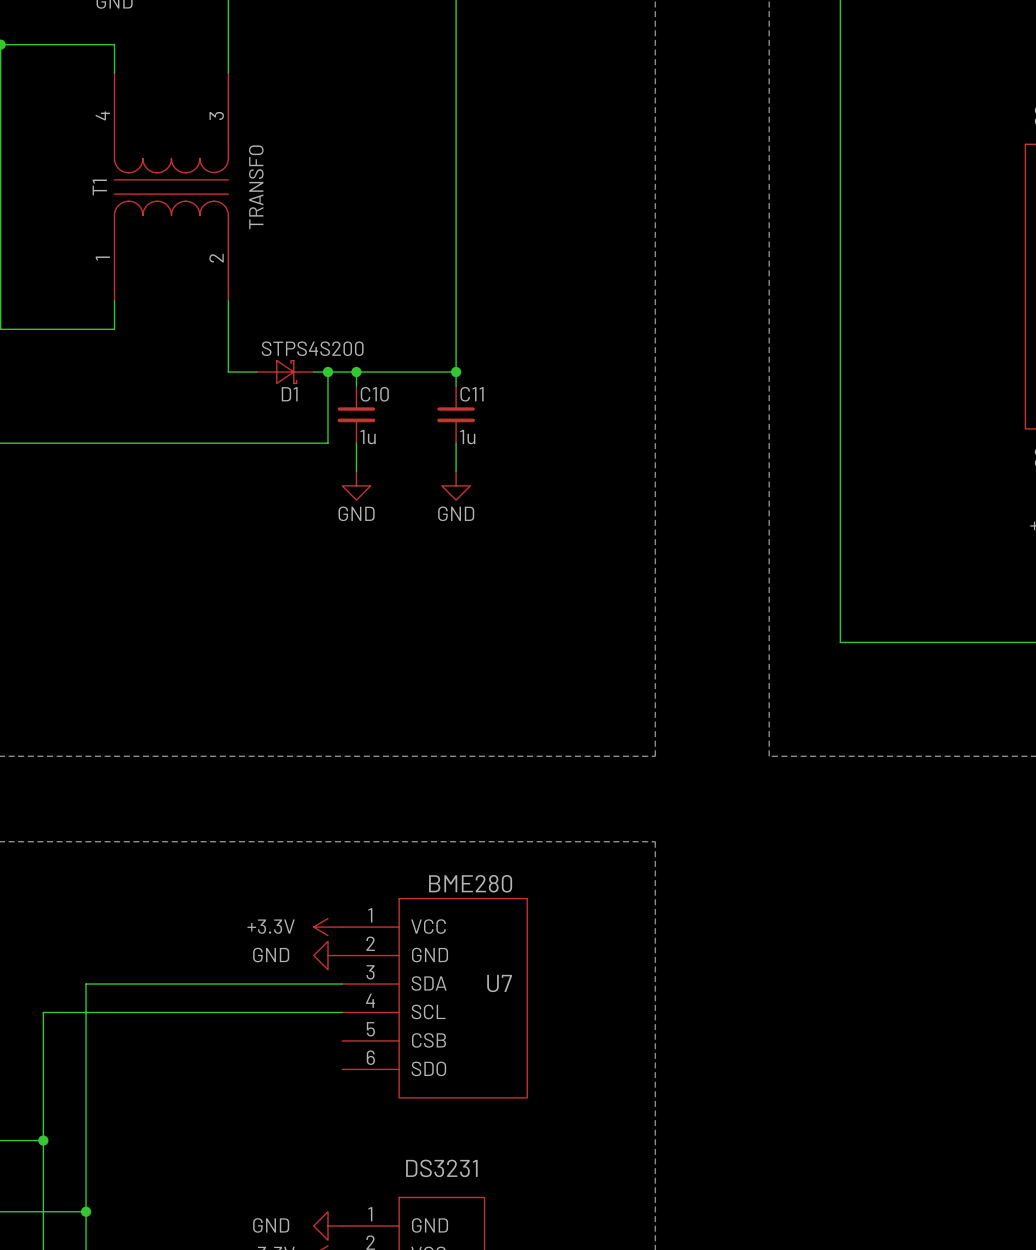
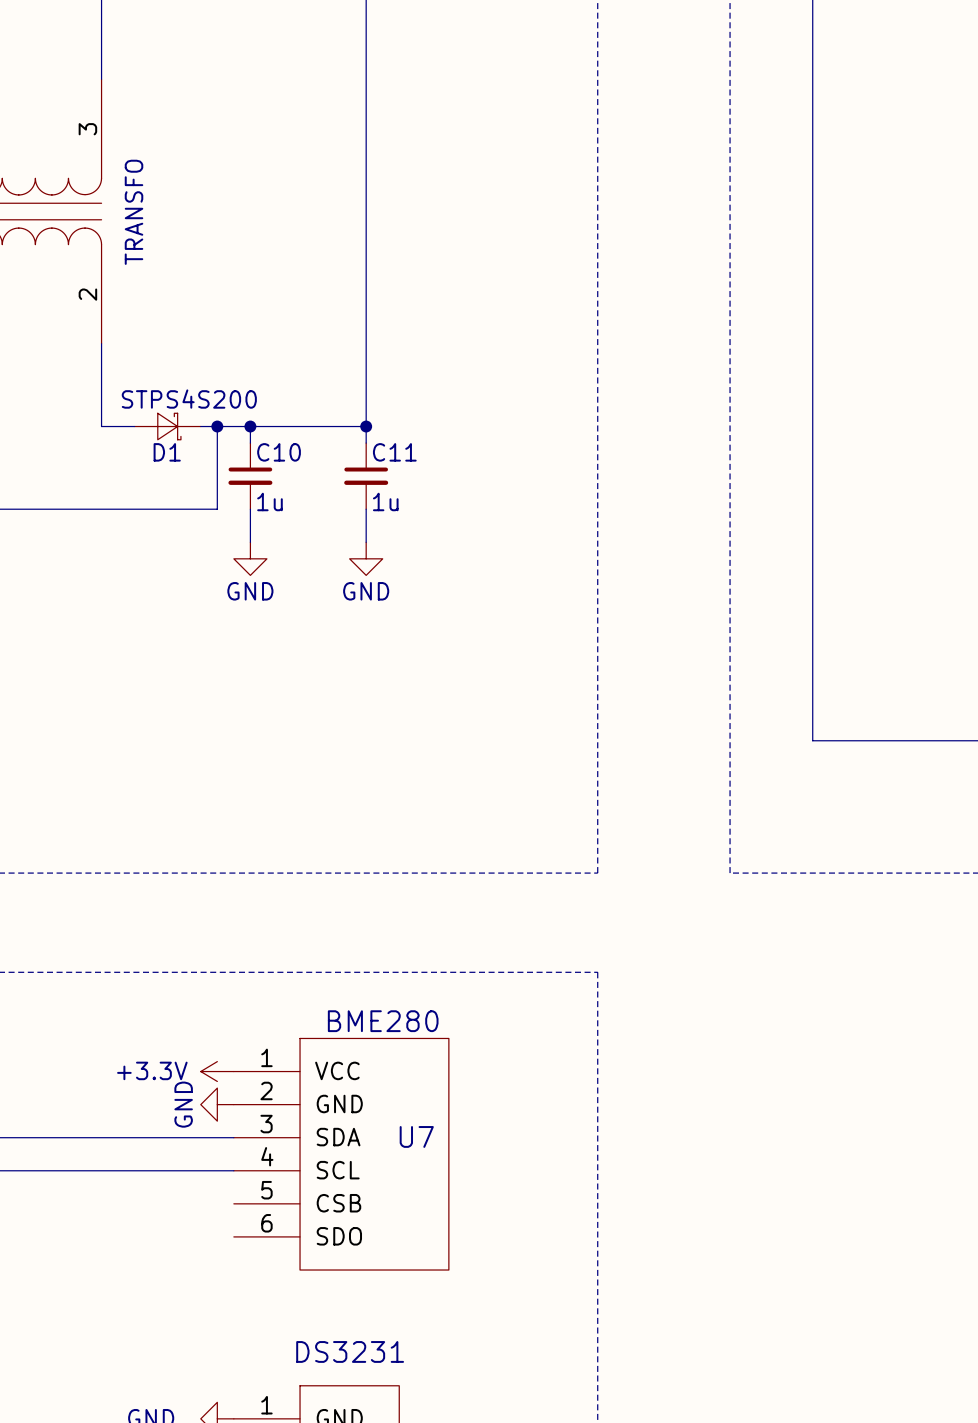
power symbol text rotation: 0° (271, 955) -> 90° counterclockwise (183, 1104)

